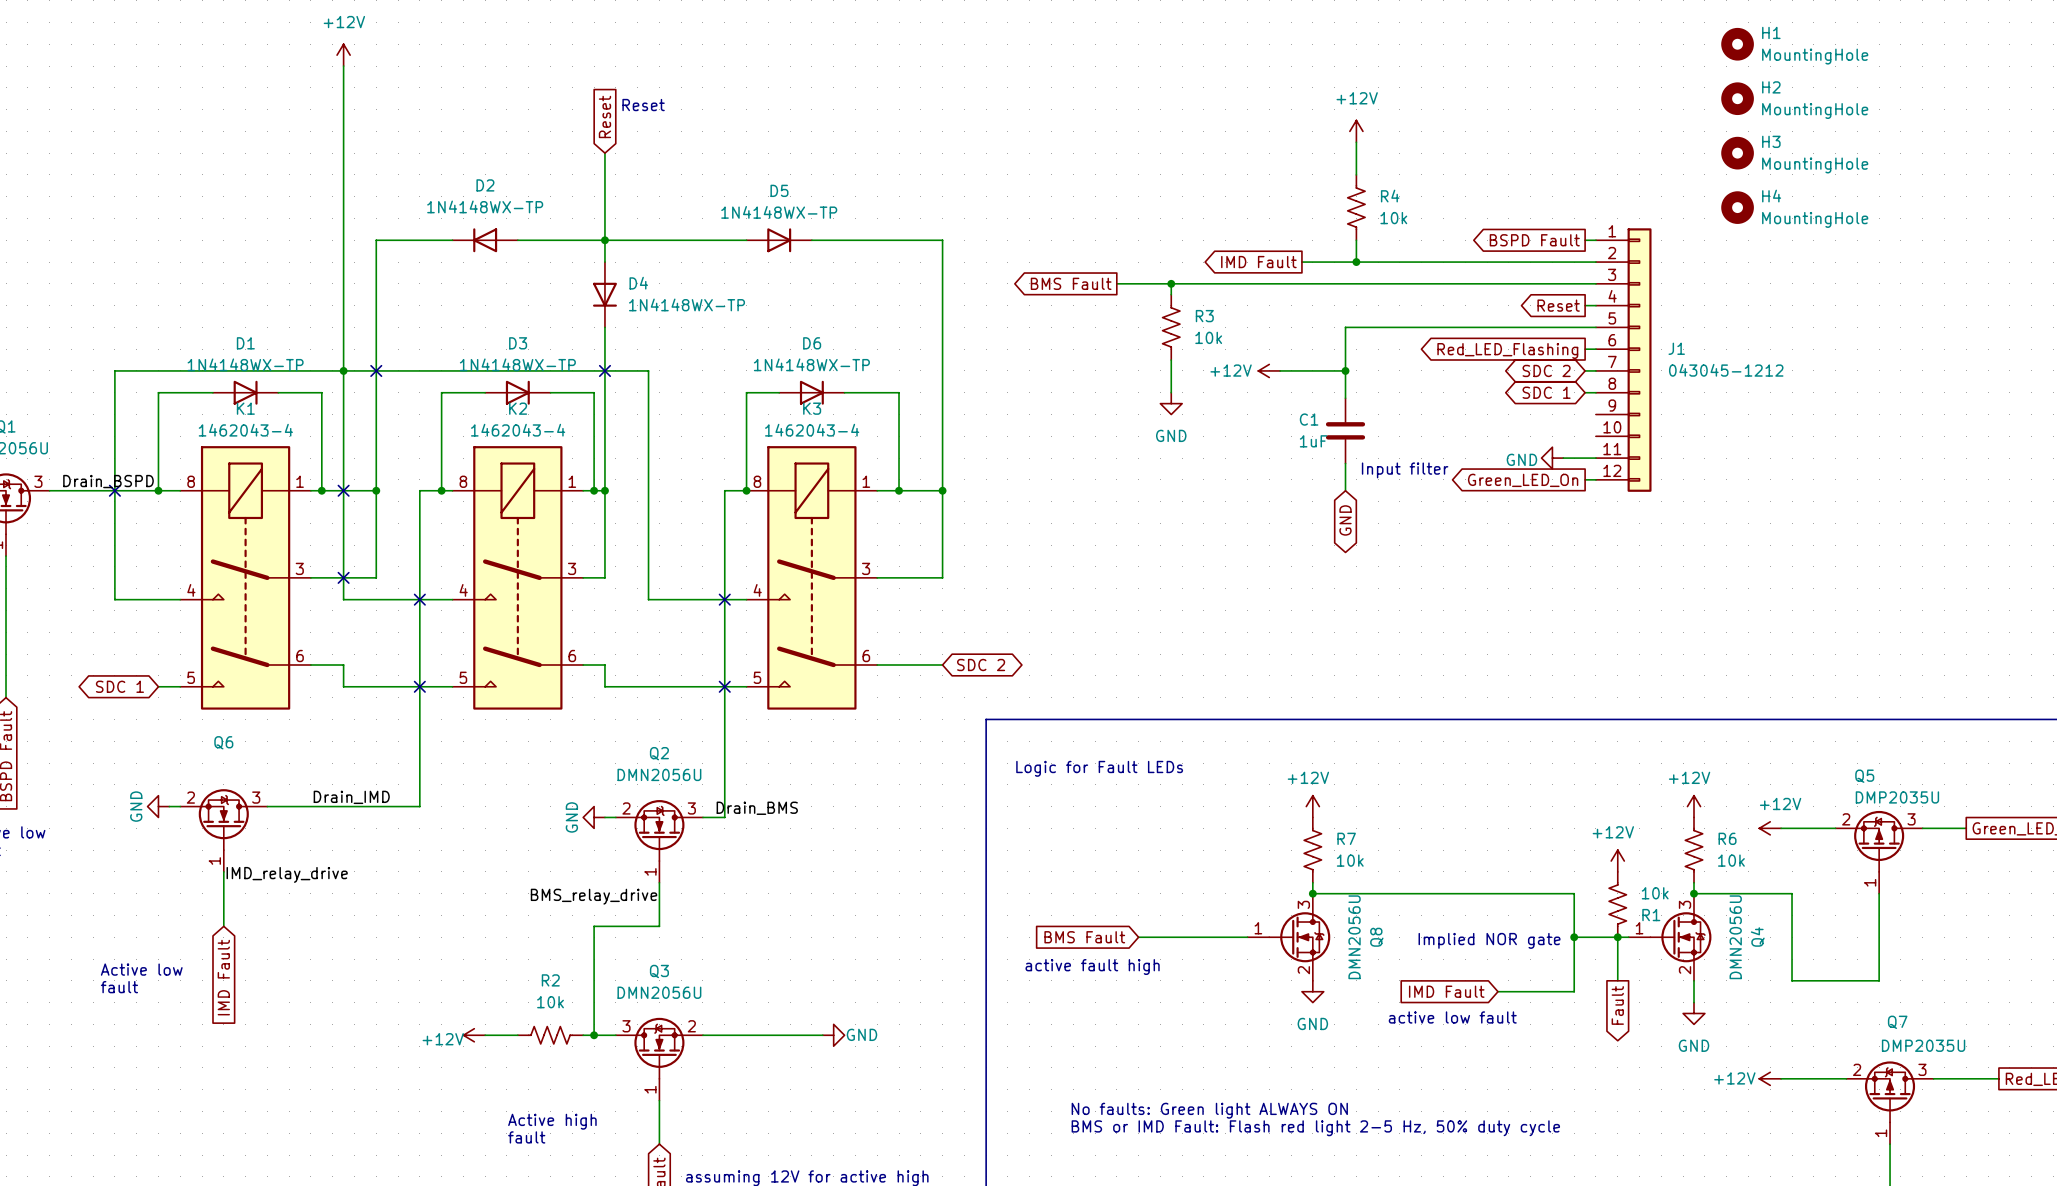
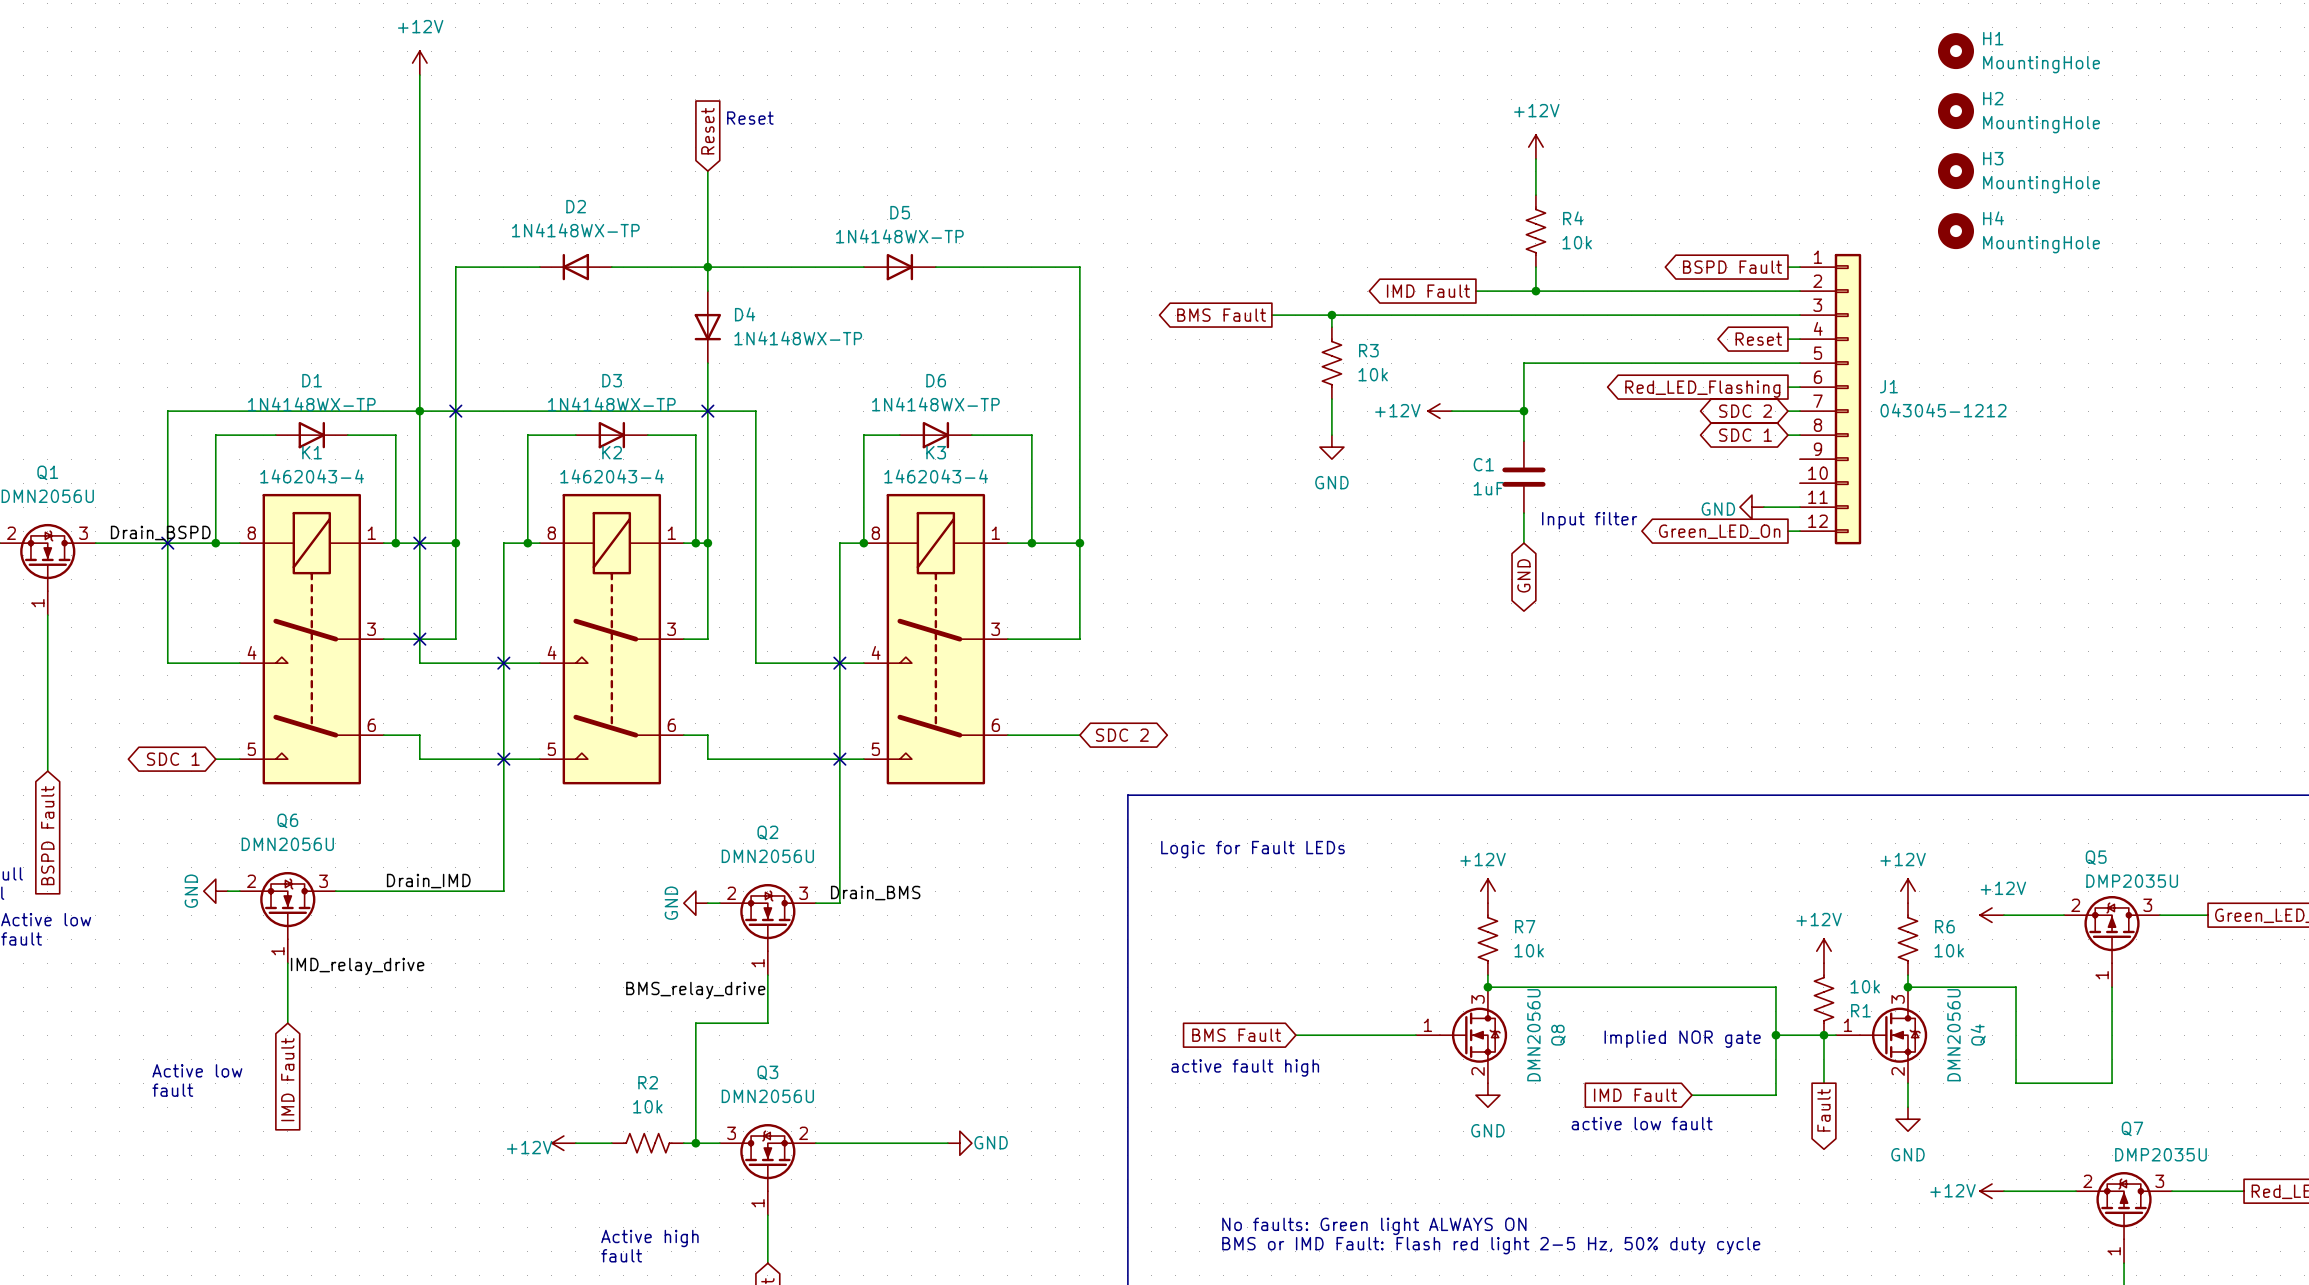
Q6 value: none -> DMN2056U (287, 844)

